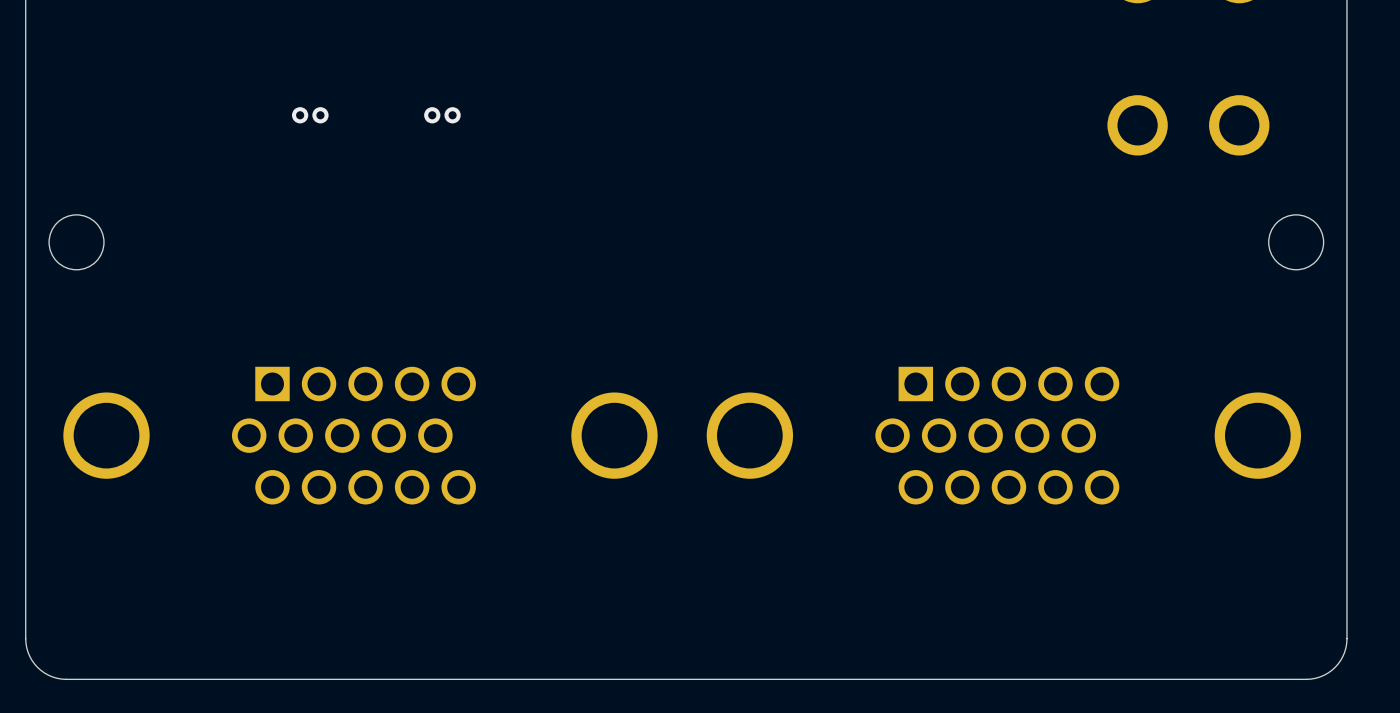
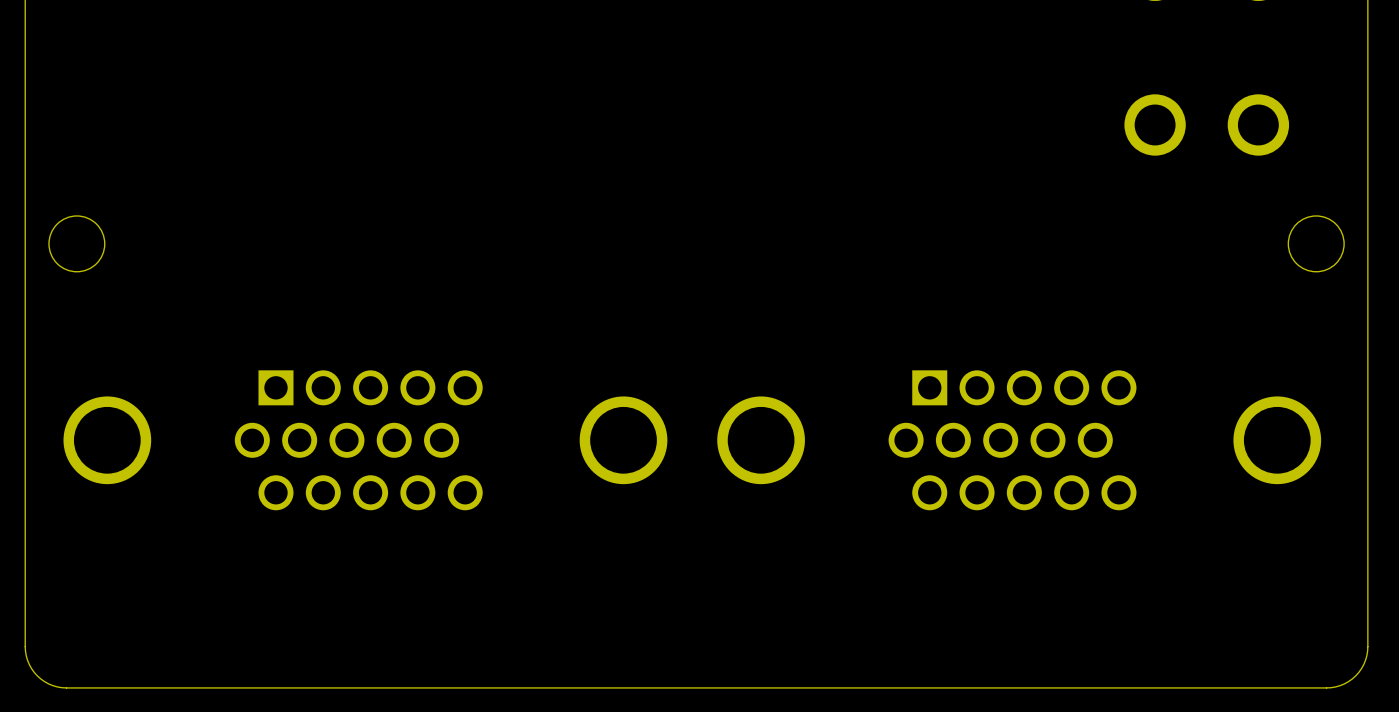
via: (300, 115) -> none
via: (320, 115) -> none
via: (432, 115) -> none
via: (452, 115) -> none

